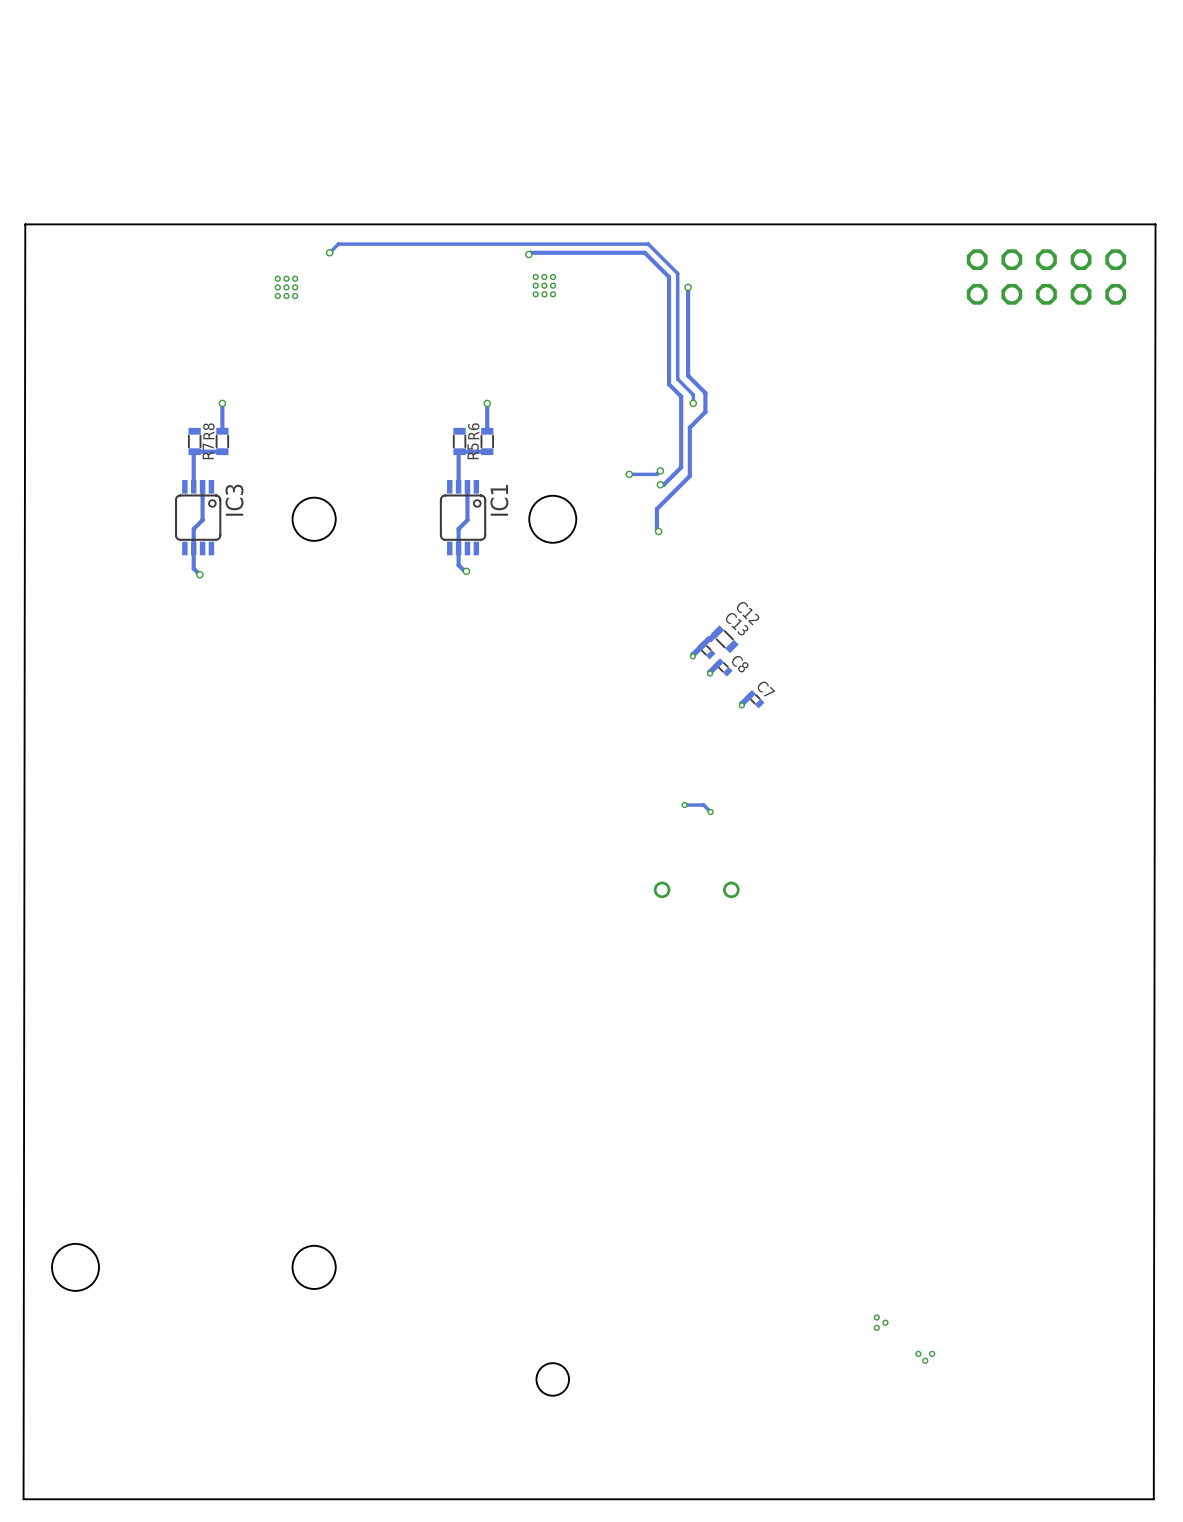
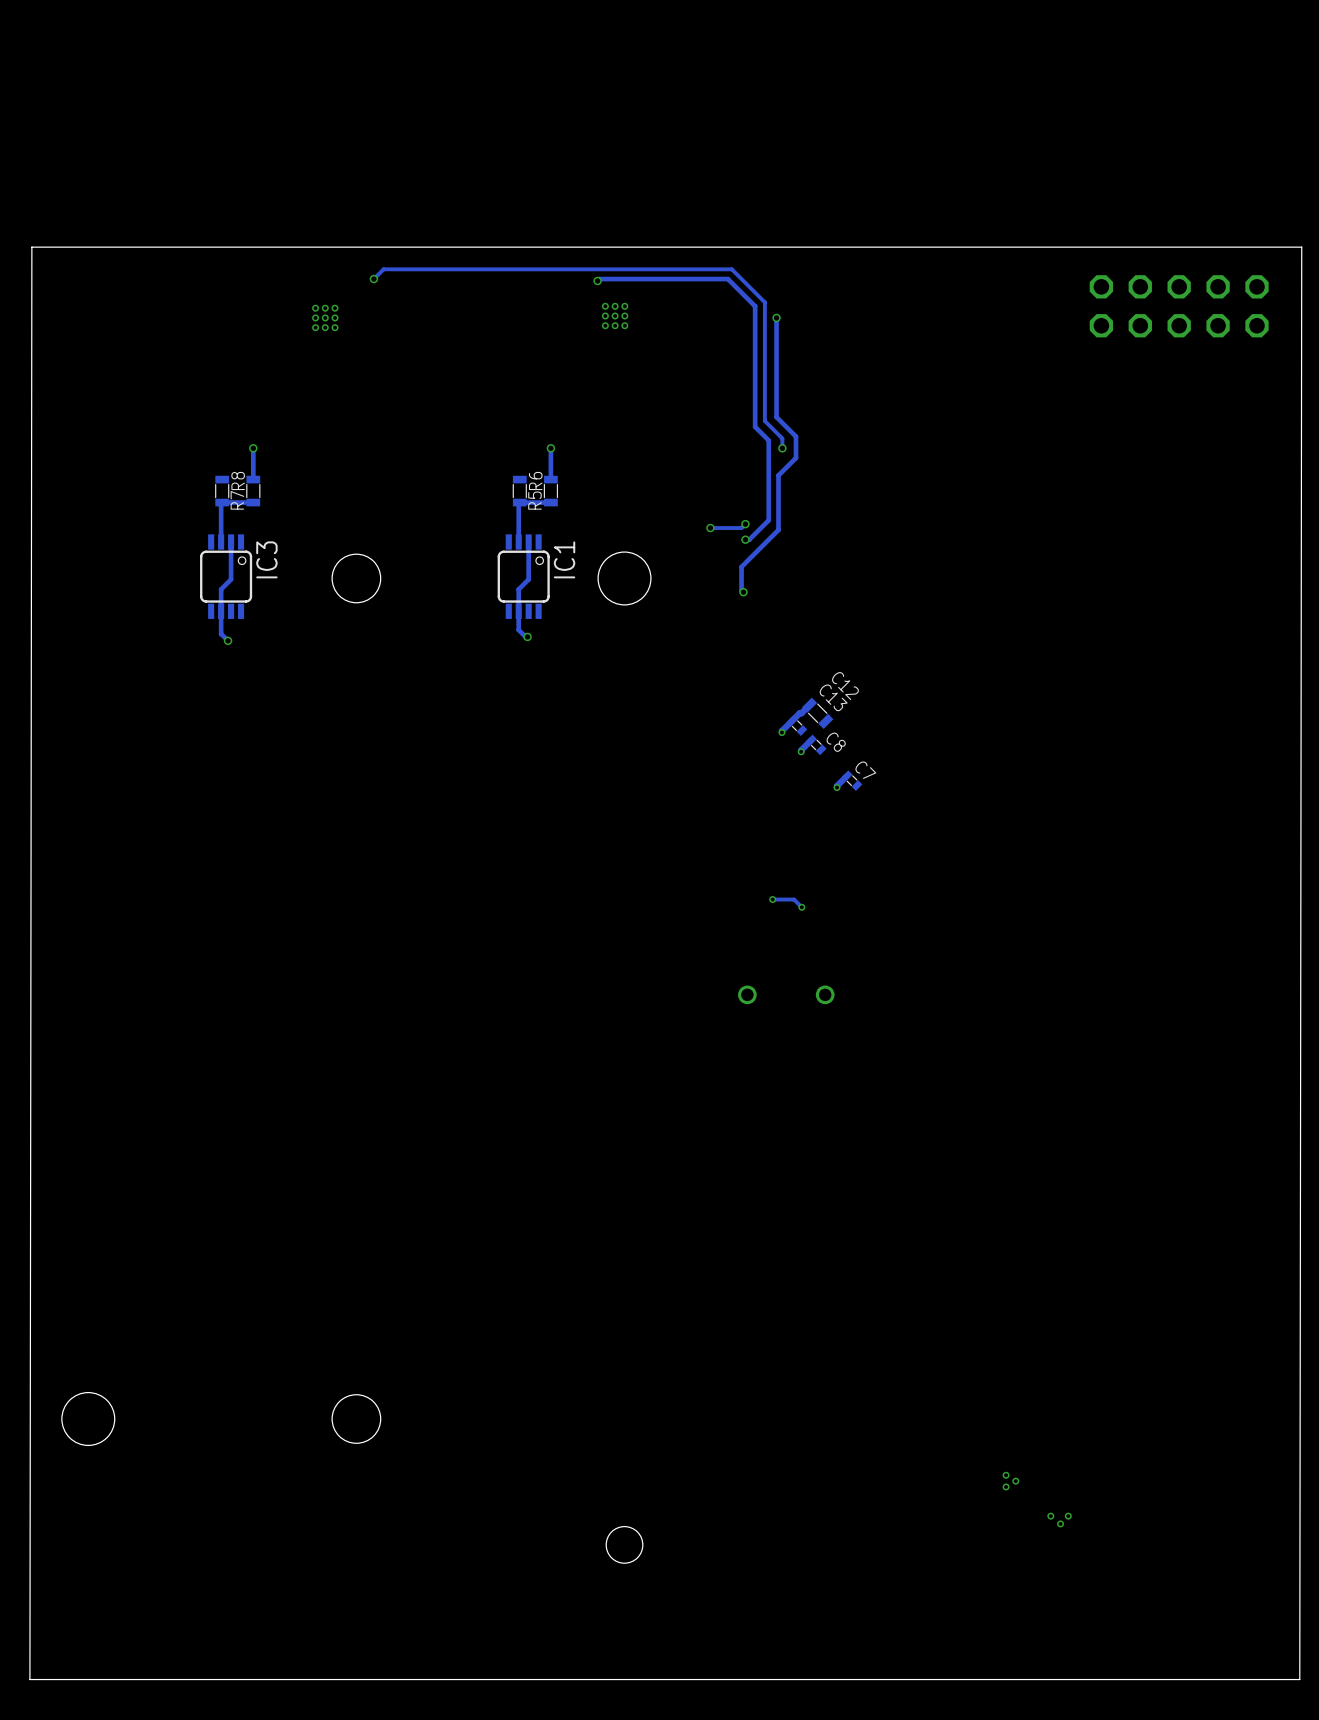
via: (876, 1317) -> none
via: none -> (1006, 1475)
via: (885, 1322) -> none
via: none -> (1015, 1481)
via: (876, 1327) -> none
via: none -> (1006, 1486)
via: (918, 1353) -> none
via: none -> (1068, 1516)
via: (925, 1360) -> none
via: none -> (1060, 1523)

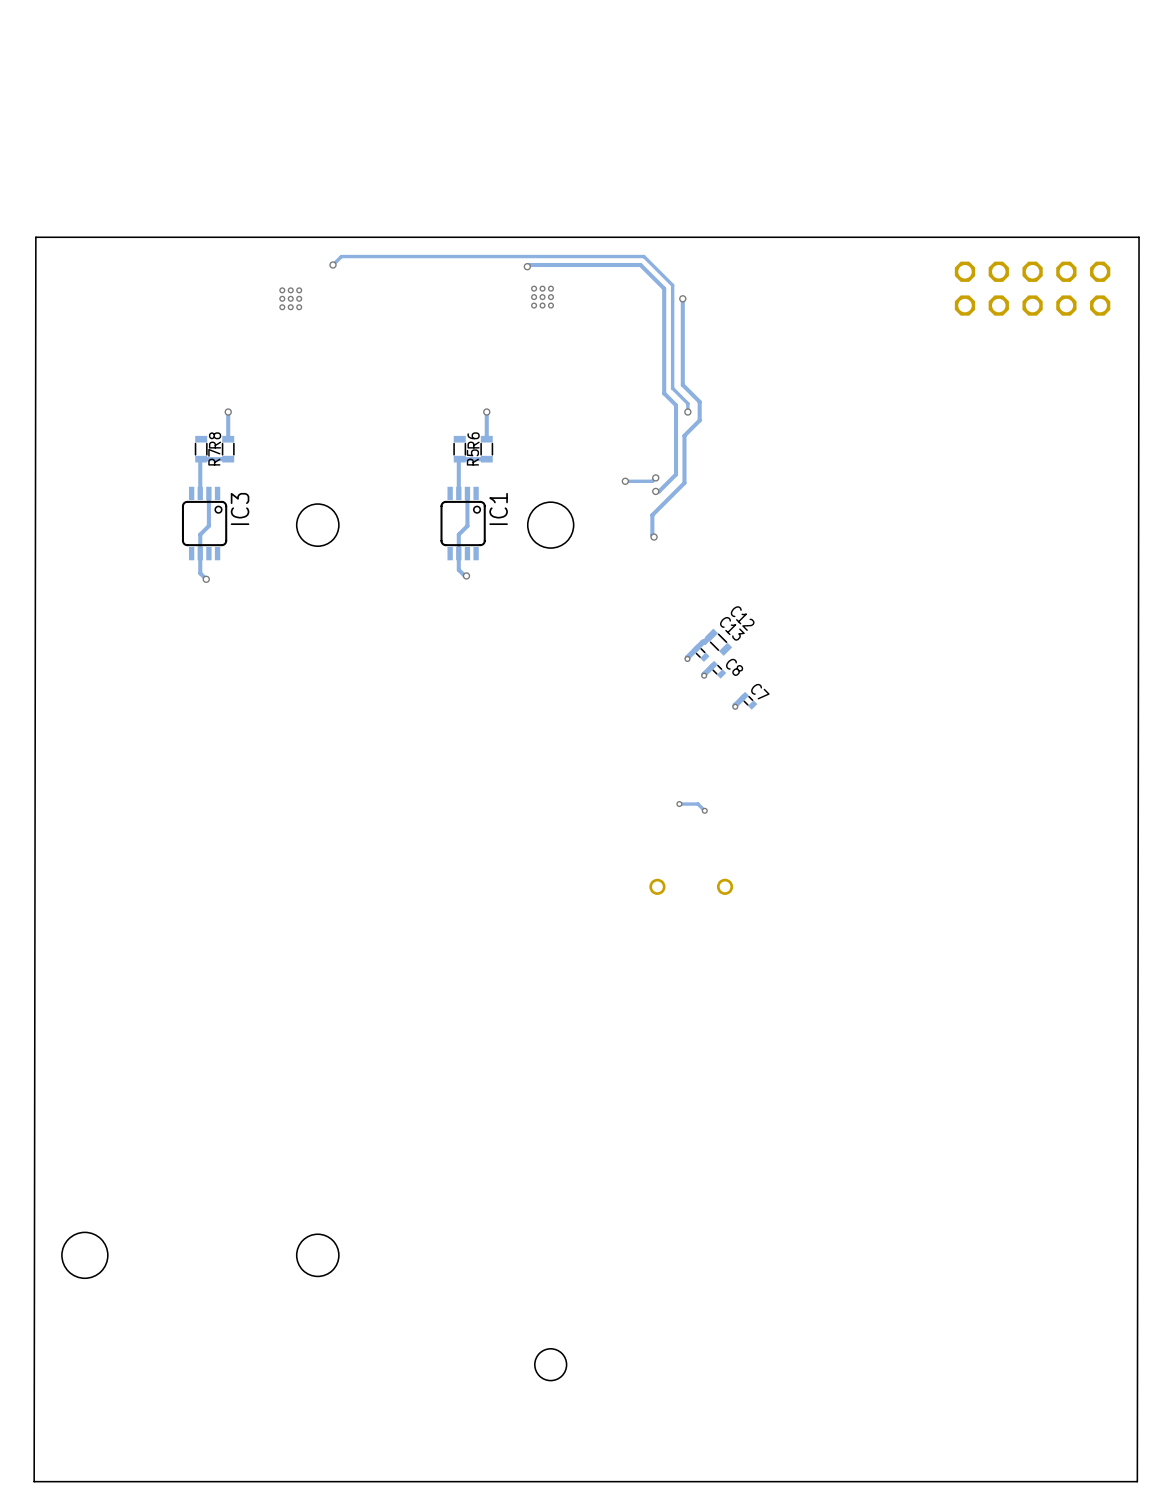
via: (1006, 1475) -> none
via: (1015, 1481) -> none
via: (1006, 1486) -> none
via: (1050, 1516) -> none
via: (1068, 1516) -> none
via: (1060, 1523) -> none

